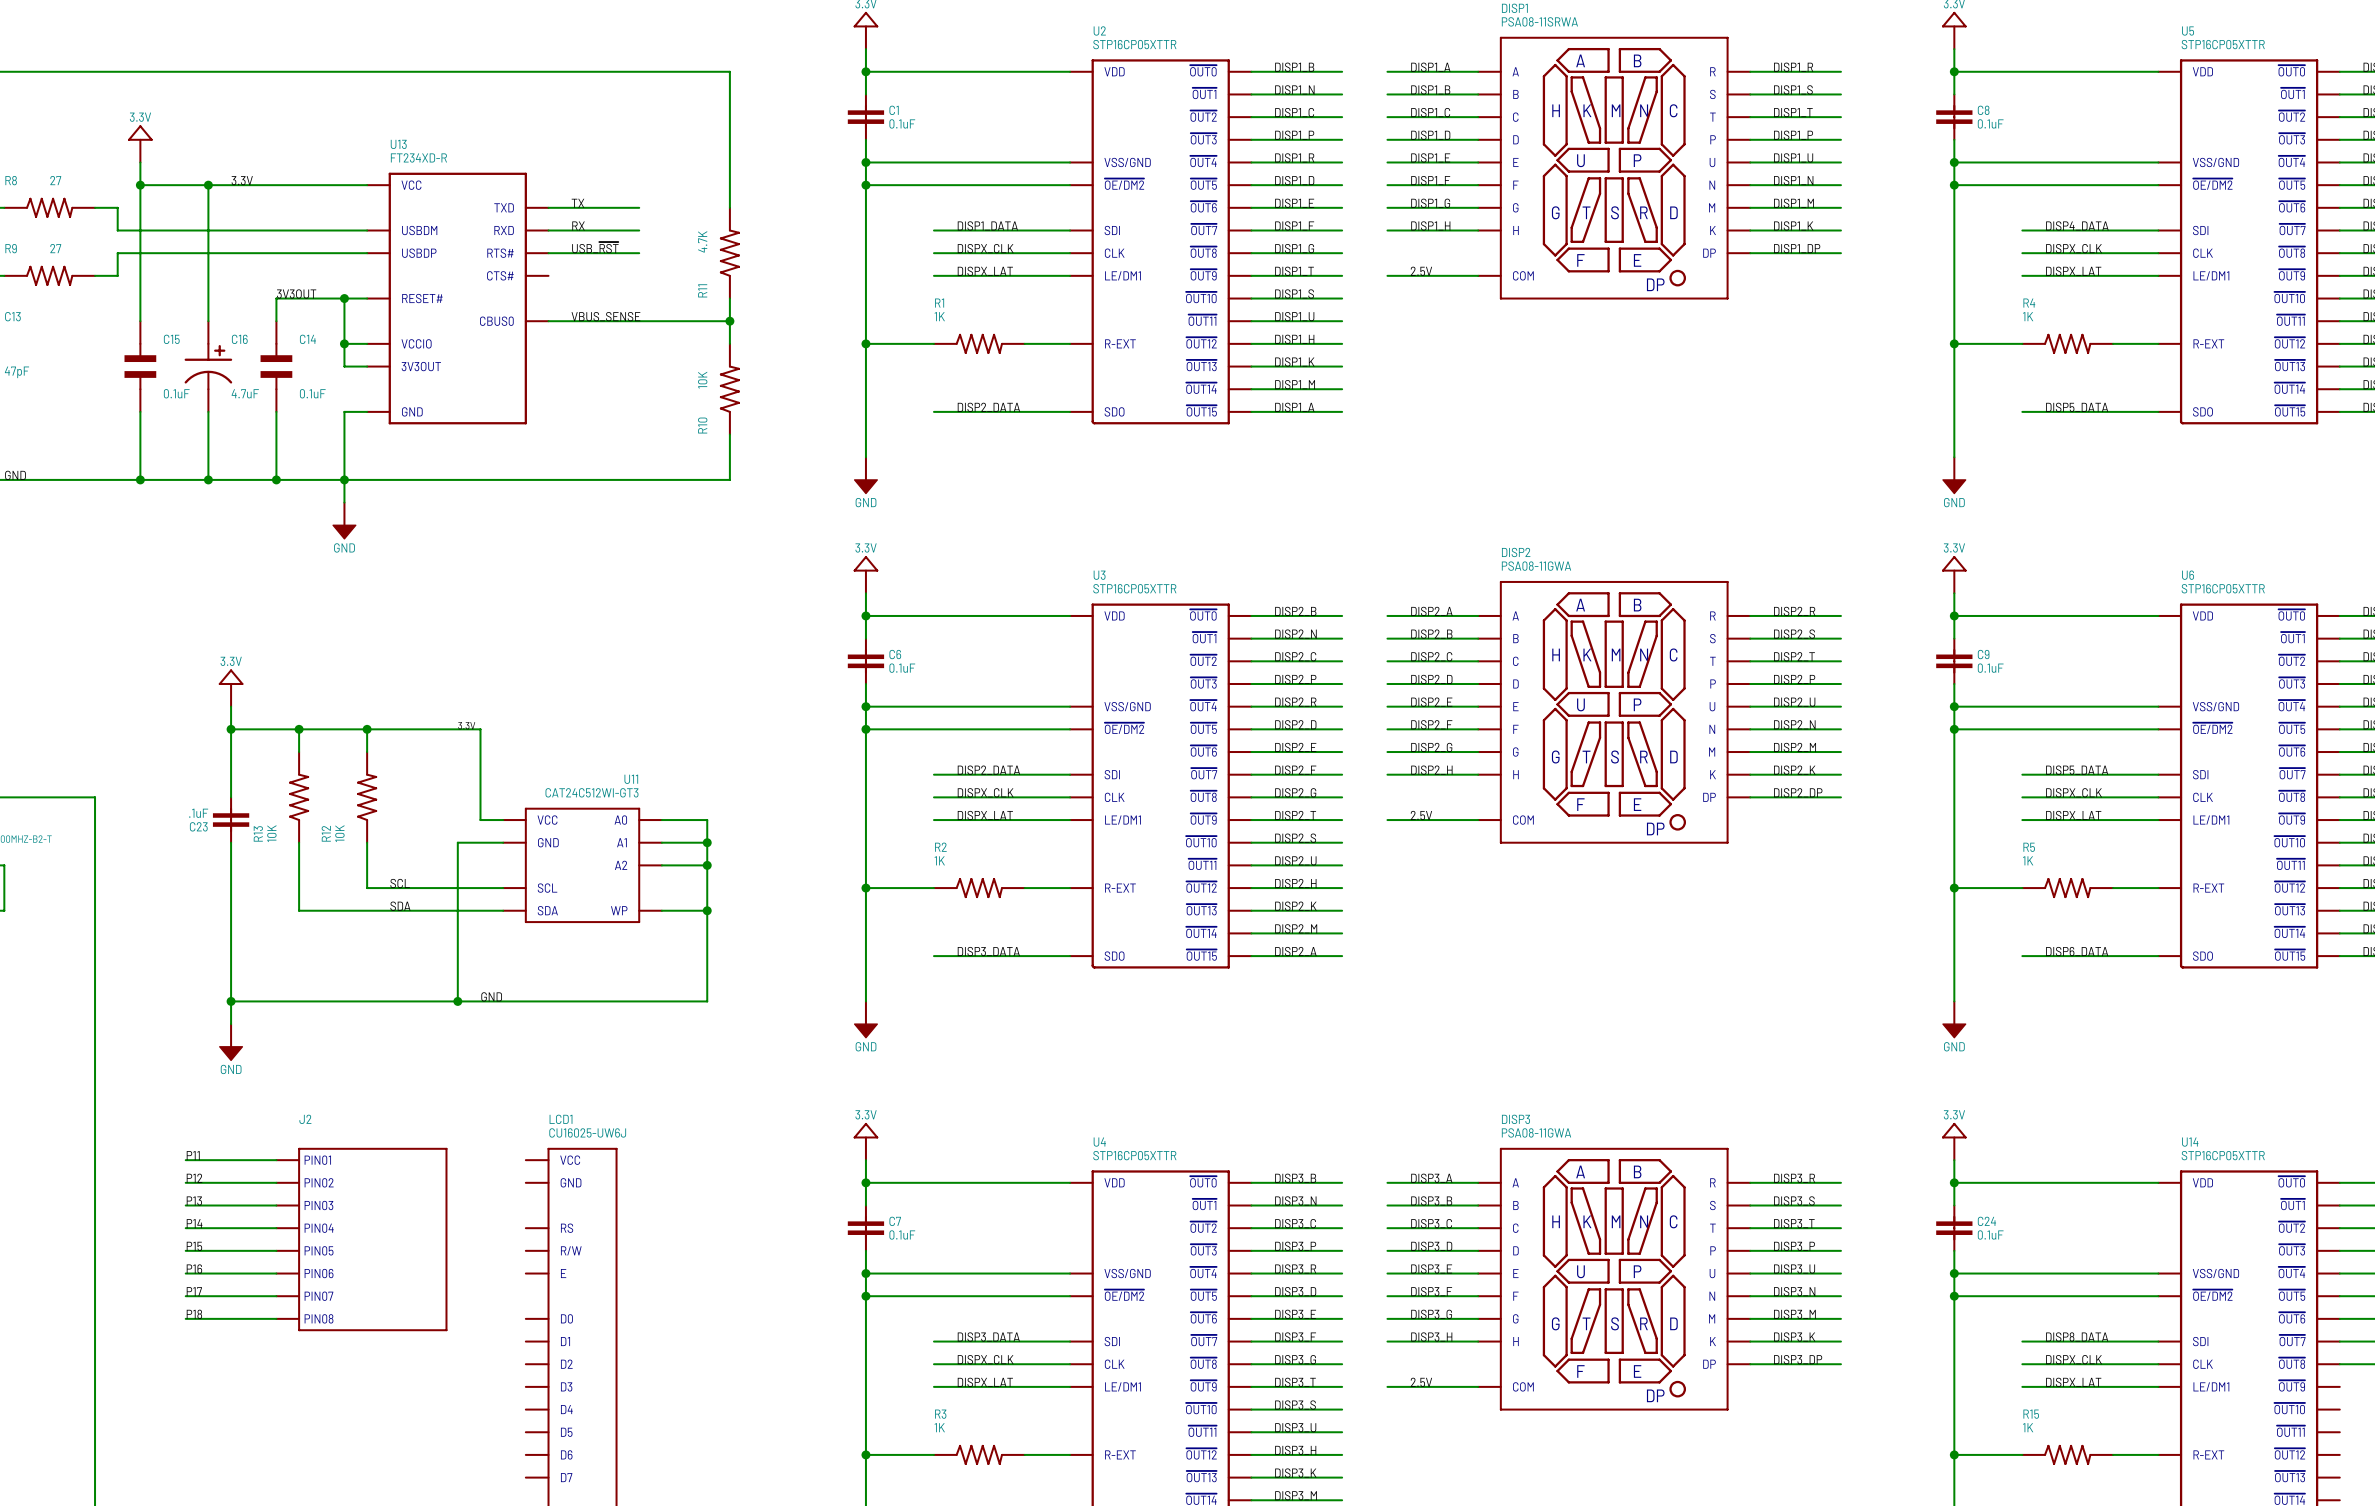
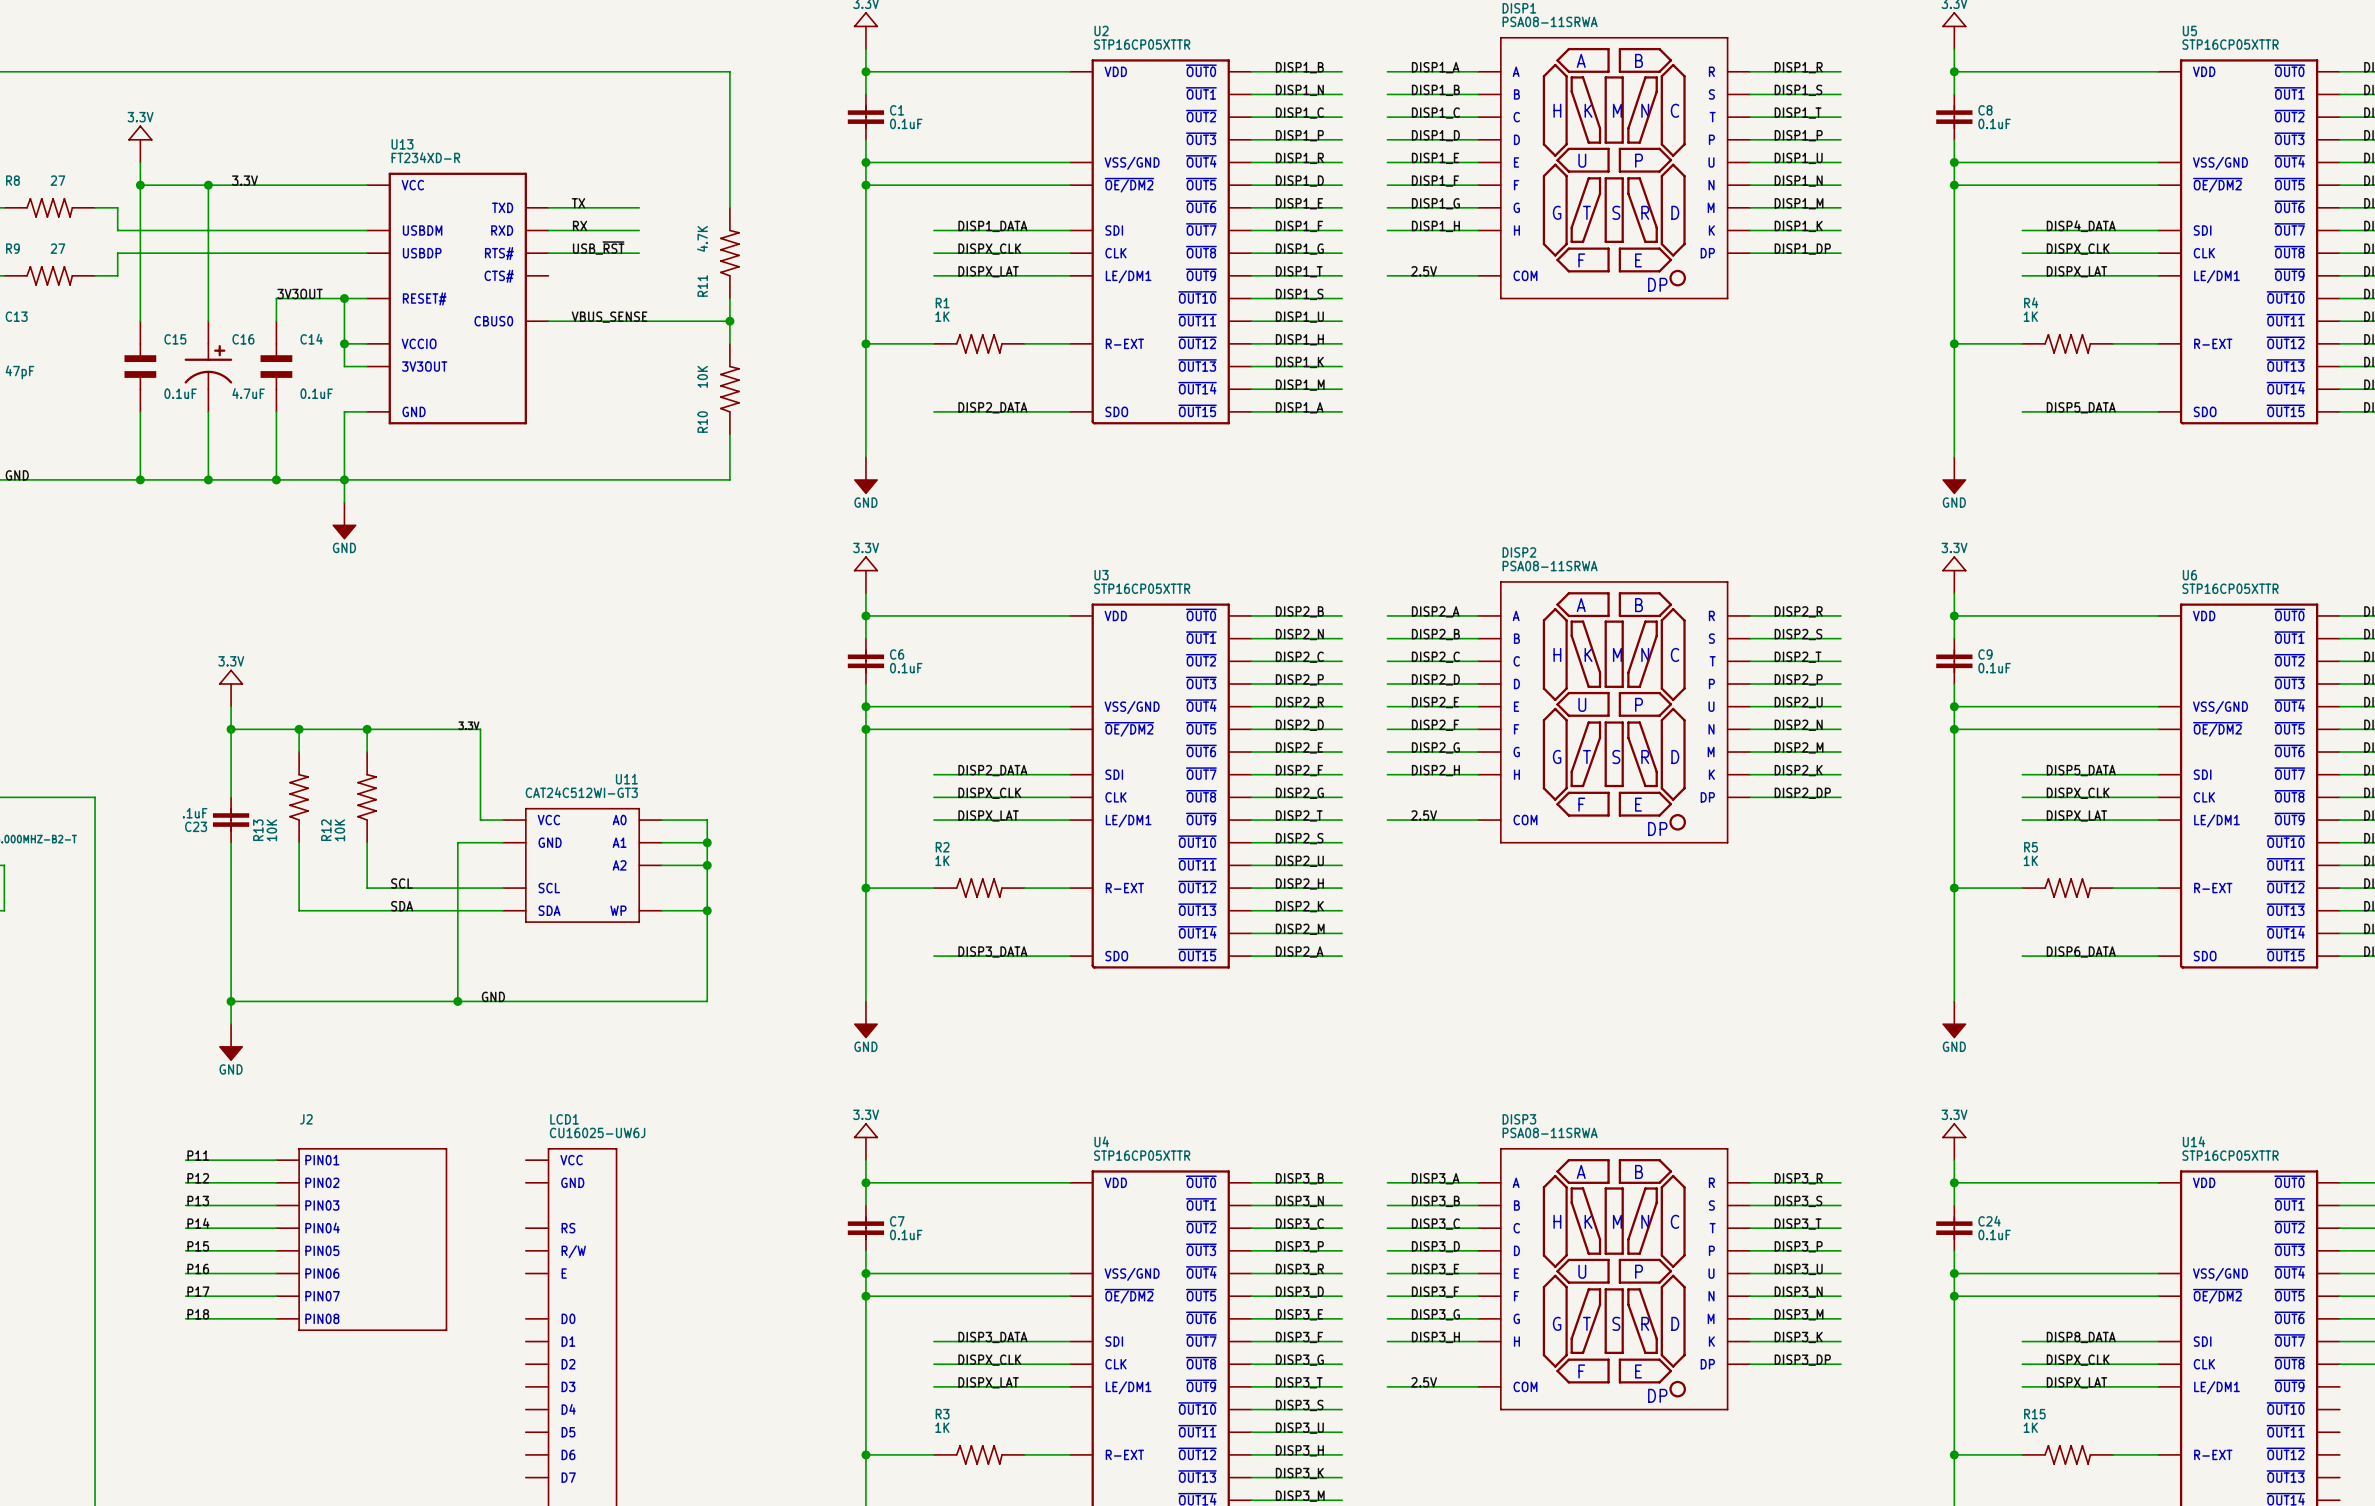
DISP2 value: PSA08-11GWA (1536, 566) -> PSA08-11SRWA (1550, 566)
DISP3 value: PSA08-11GWA (1536, 1132) -> PSA08-11SRWA (1550, 1132)

